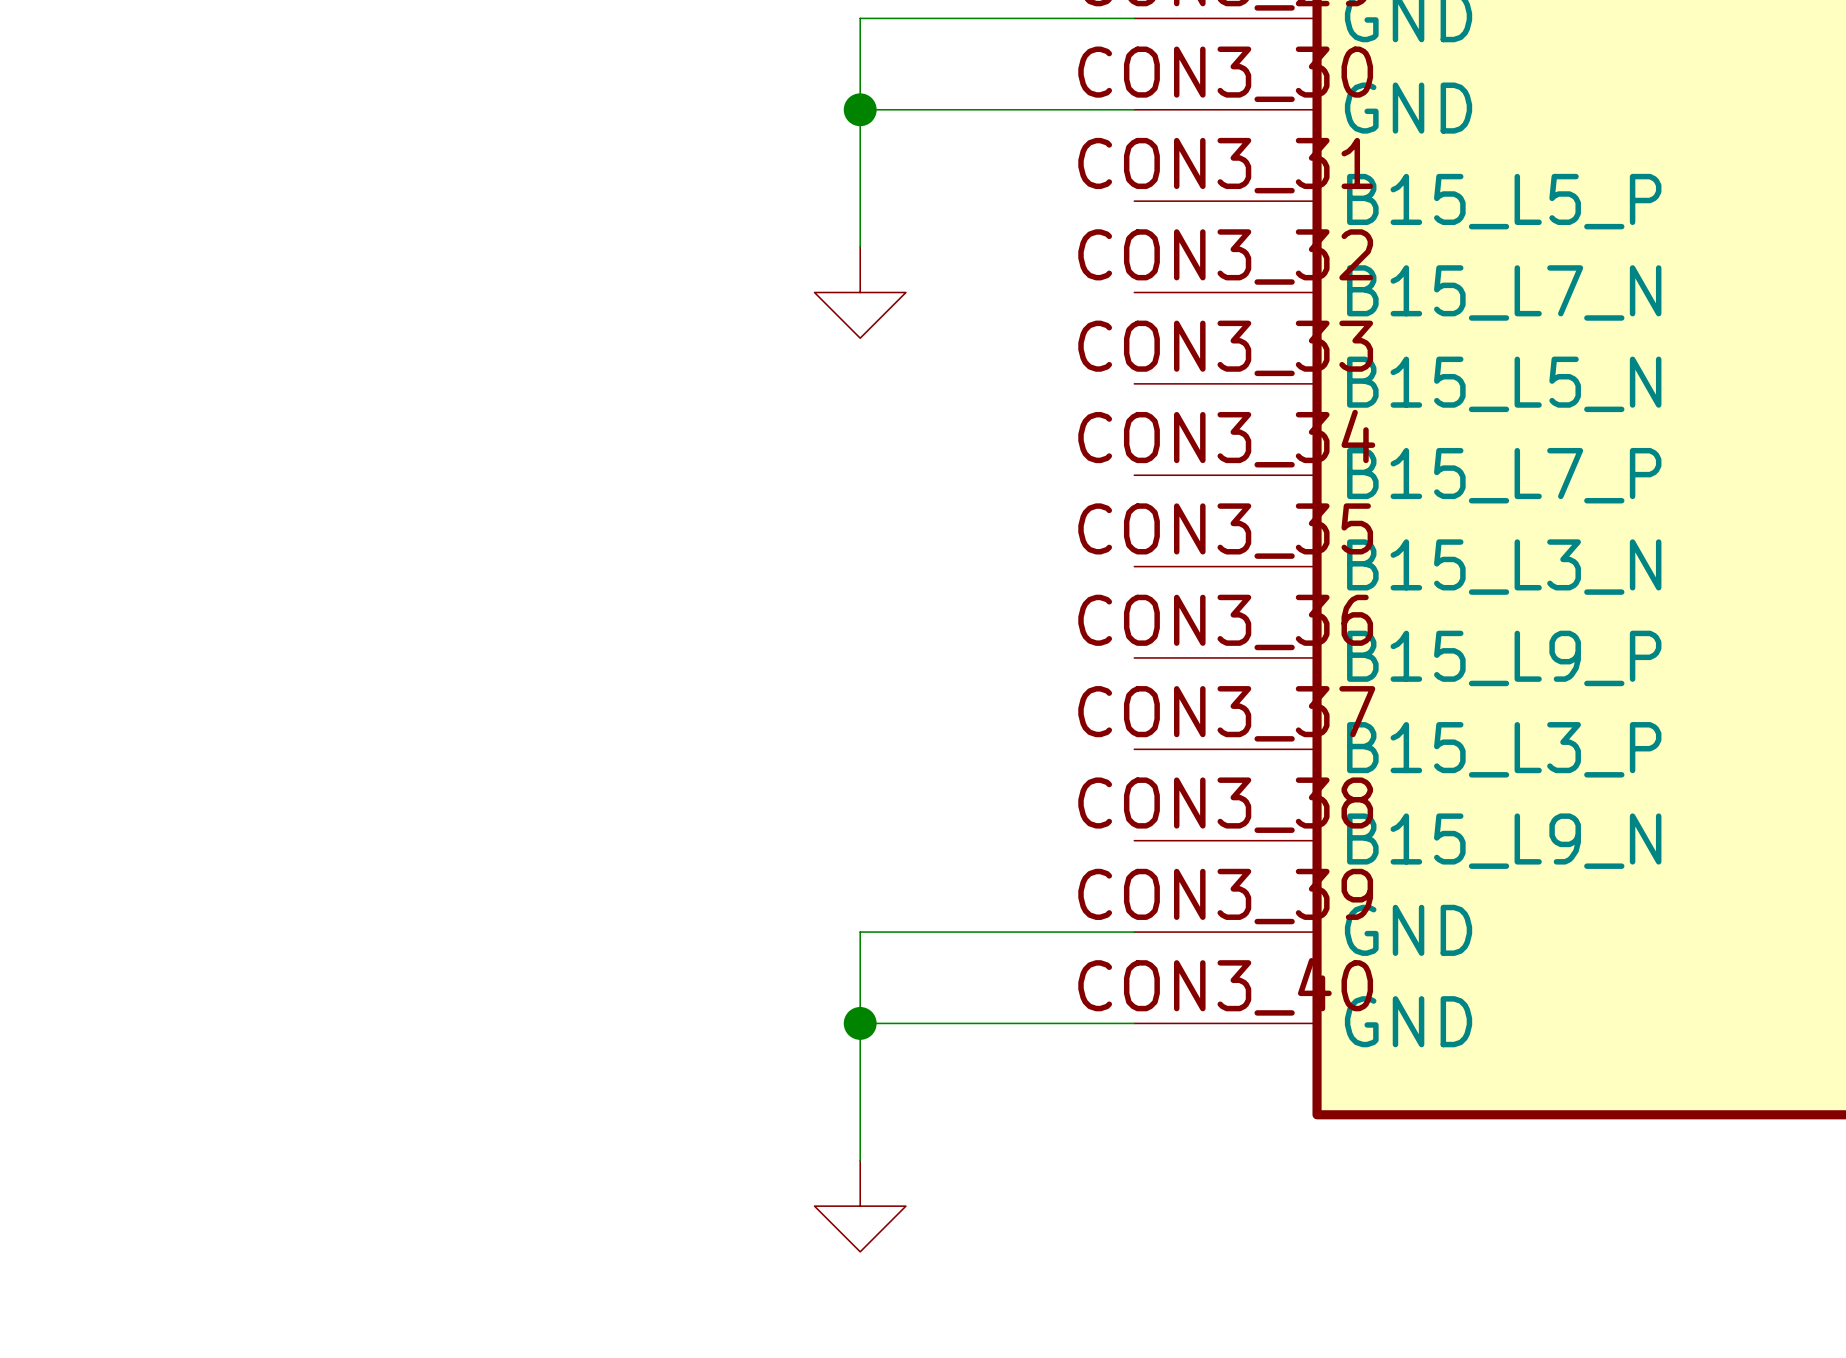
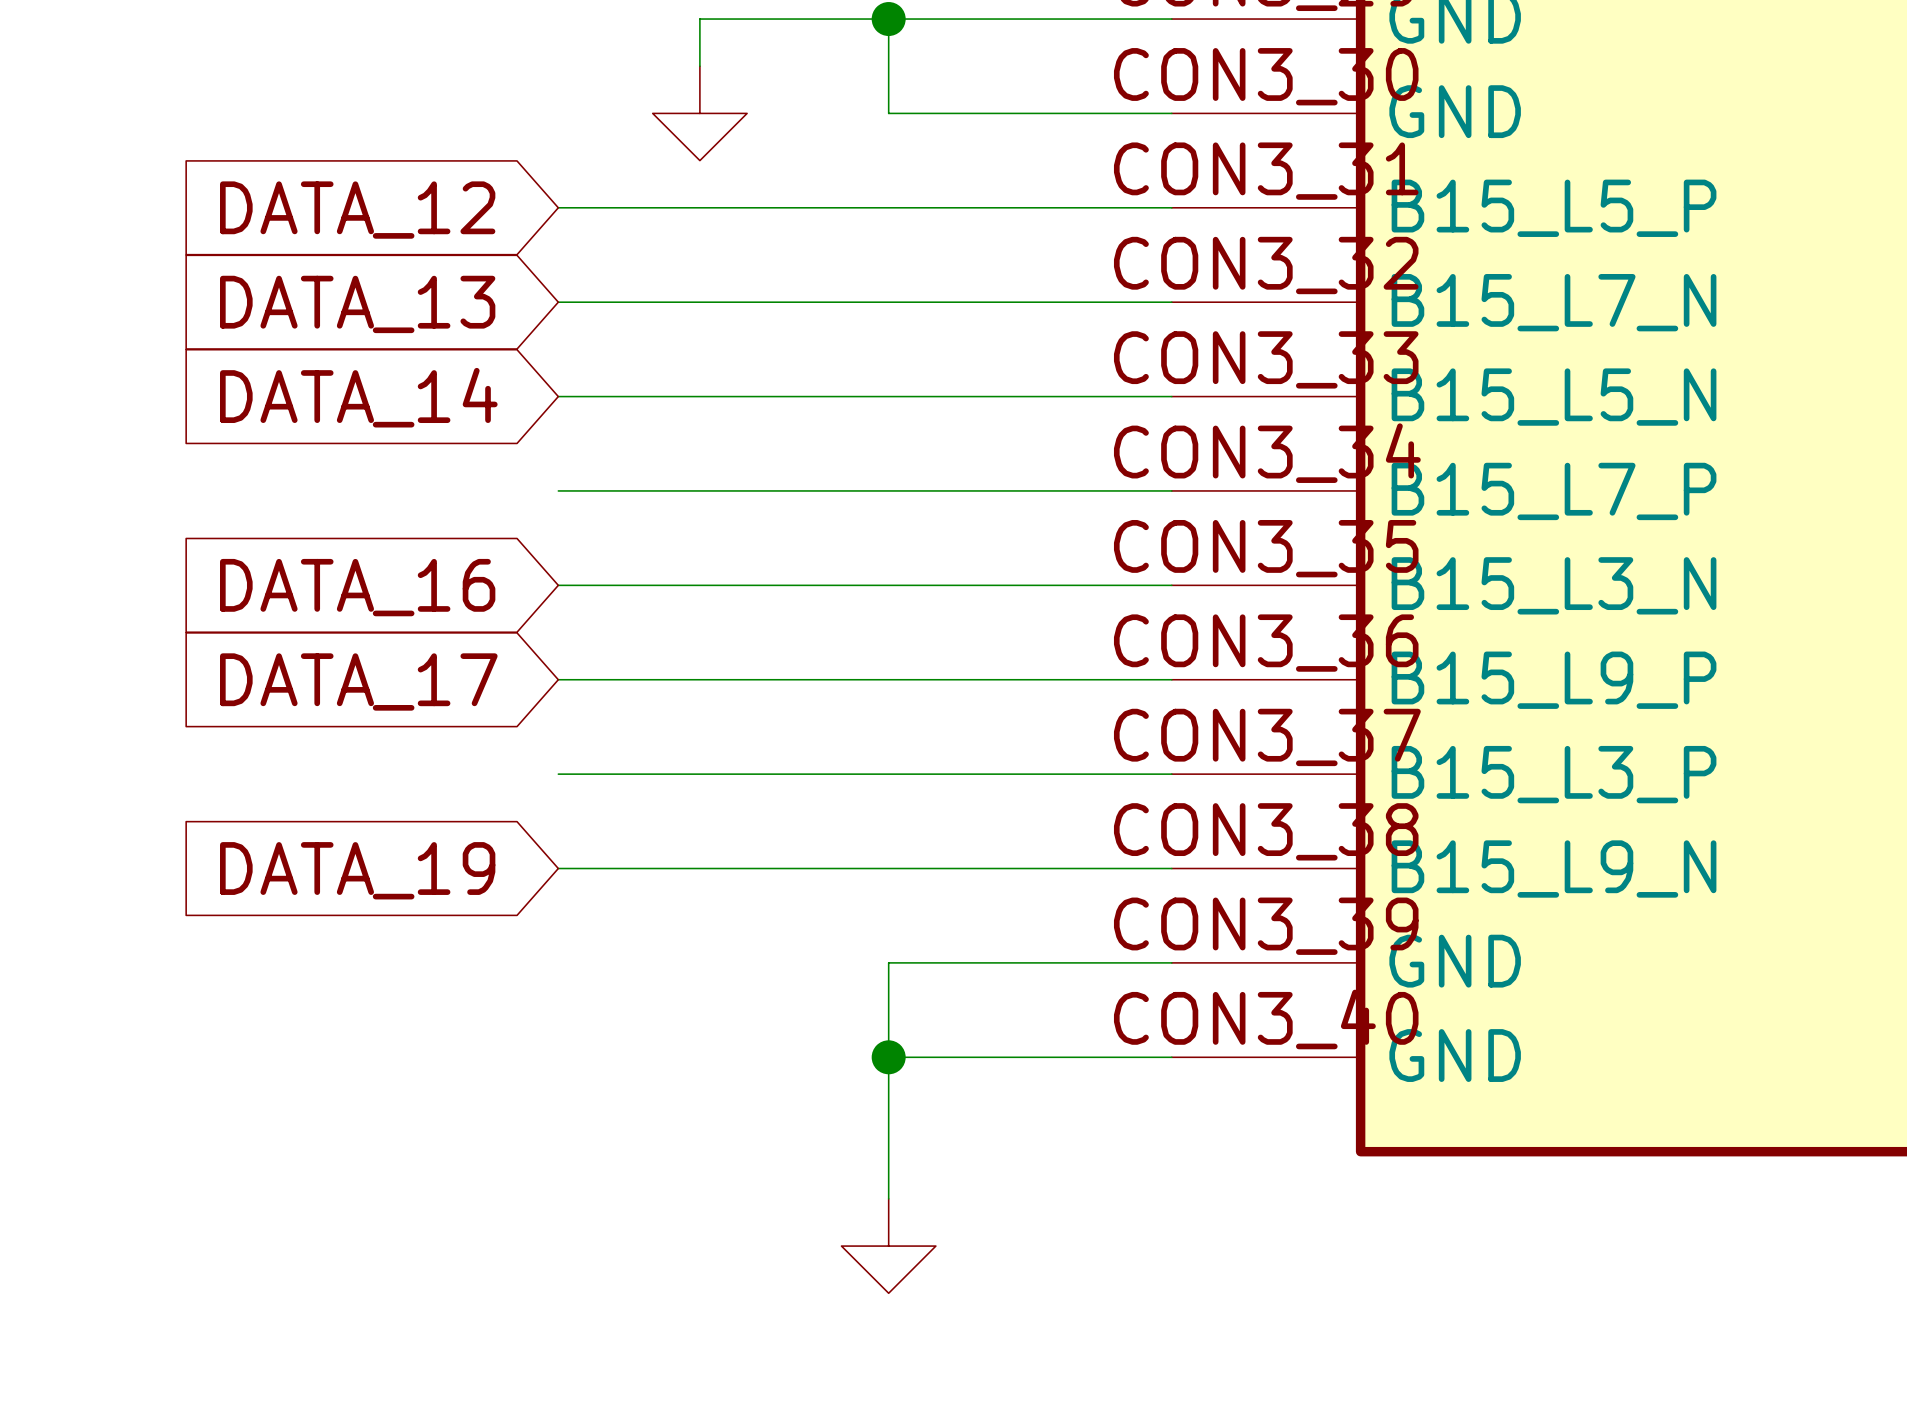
wire: none -> (888, 19) (699, 19) (699, 66)
wire: (860, 109) (860, 246) -> none
junction position: (860, 109) -> (888, 19)
wire: none -> (558, 207) (1171, 207)
global label: none -> DATA_12 (357, 210)
wire: none -> (558, 302) (1171, 302)
power symbol position: (860, 292) -> (699, 113)
global label: none -> DATA_13 (357, 304)
wire: none -> (558, 396) (1171, 396)
global label: none -> DATA_14 (358, 397)
wire: none -> (558, 490) (1171, 490)
wire: none -> (558, 585) (1171, 585)
global label: none -> DATA_16 (357, 587)
wire: none -> (558, 679) (1171, 679)
global label: none -> DATA_17 (358, 681)
wire: none -> (558, 774) (1171, 774)
wire: none -> (558, 868) (1171, 868)
global label: none -> DATA_19 (357, 870)

